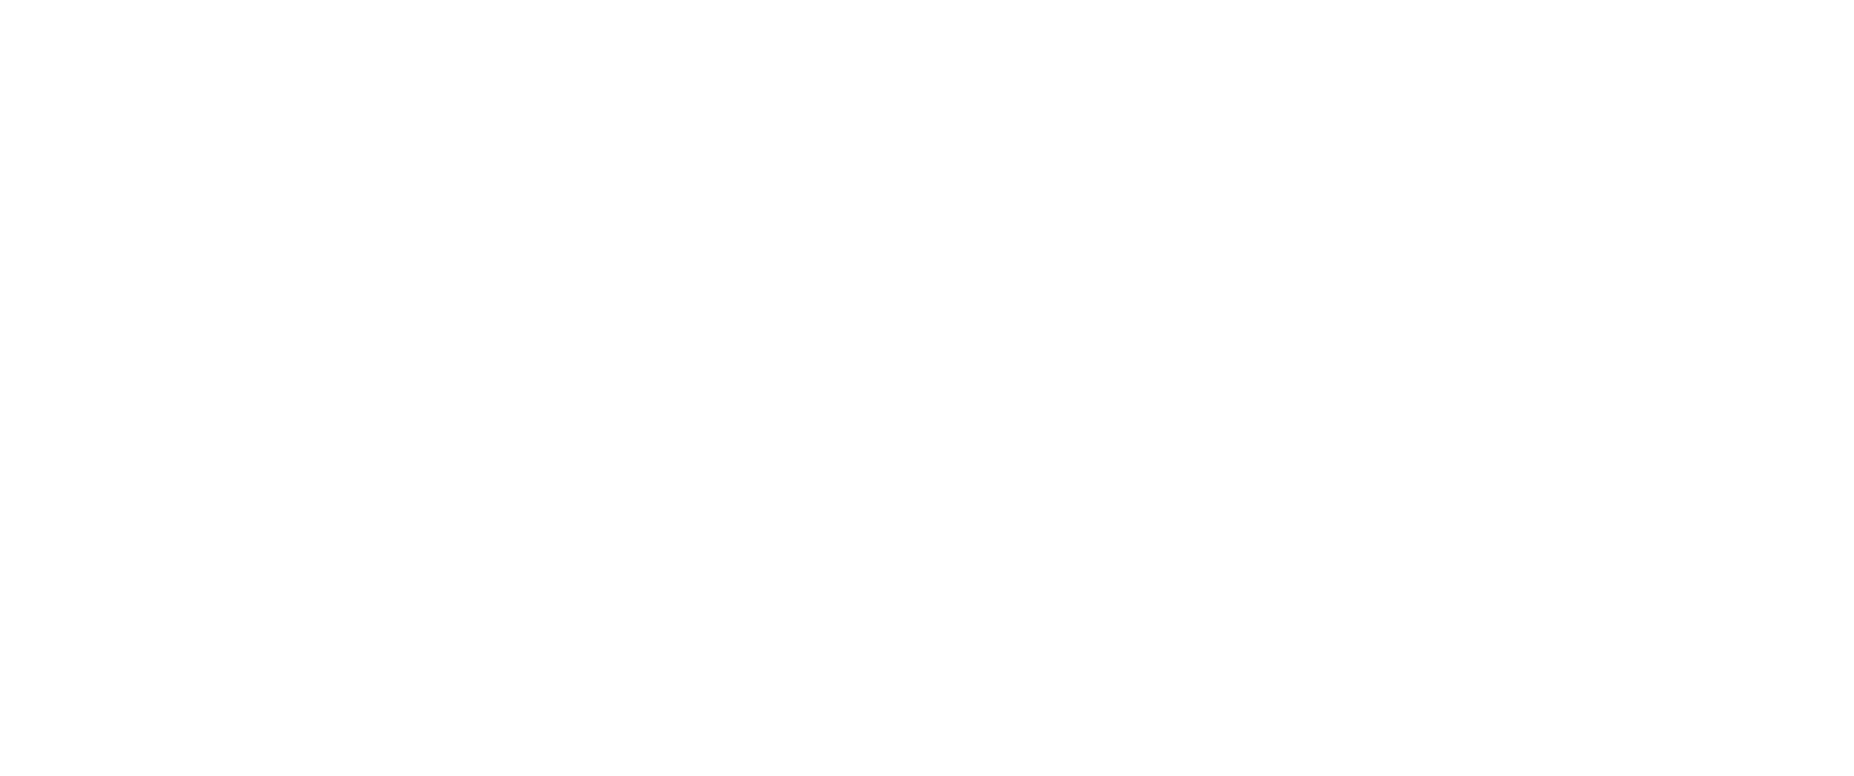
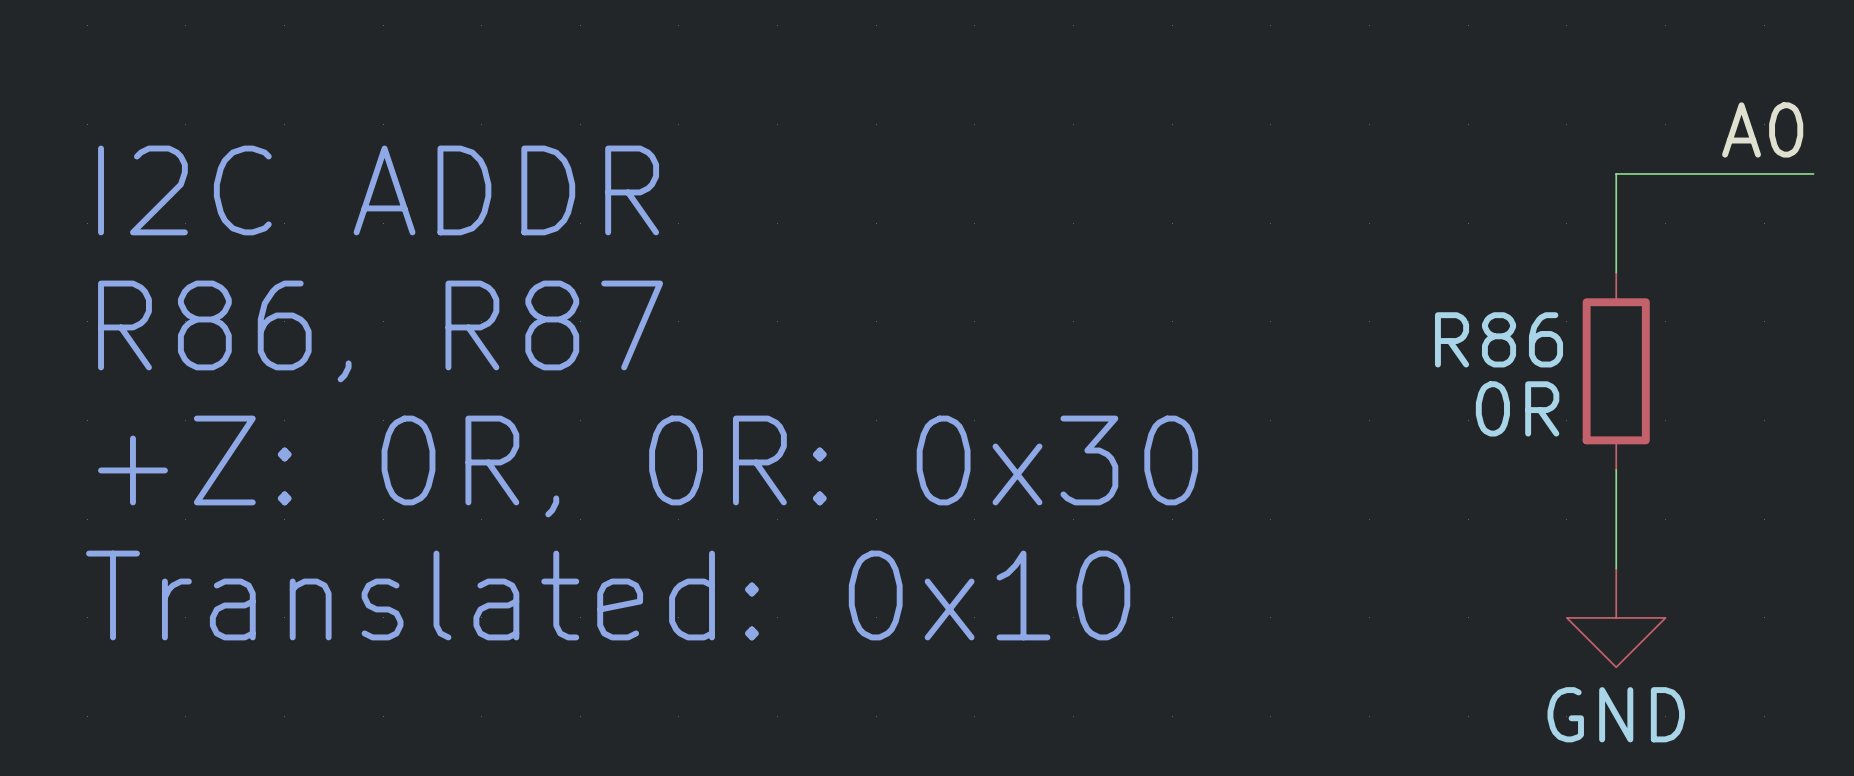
label: none -> A0 (1762, 129)
wire: none -> (1813, 173) (1616, 173) (1616, 272)
text: none -> I2C ADDR (378, 190)
text: none -> R86, R87 (380, 331)
R86: none -> 0R (1616, 371)
text: none -> +Z: 0R, 0R: 0x30 (648, 466)
wire: none -> (1616, 469) (1616, 568)
text: none -> Translated: 0x10 (608, 595)
power symbol: none -> GND (1616, 617)

